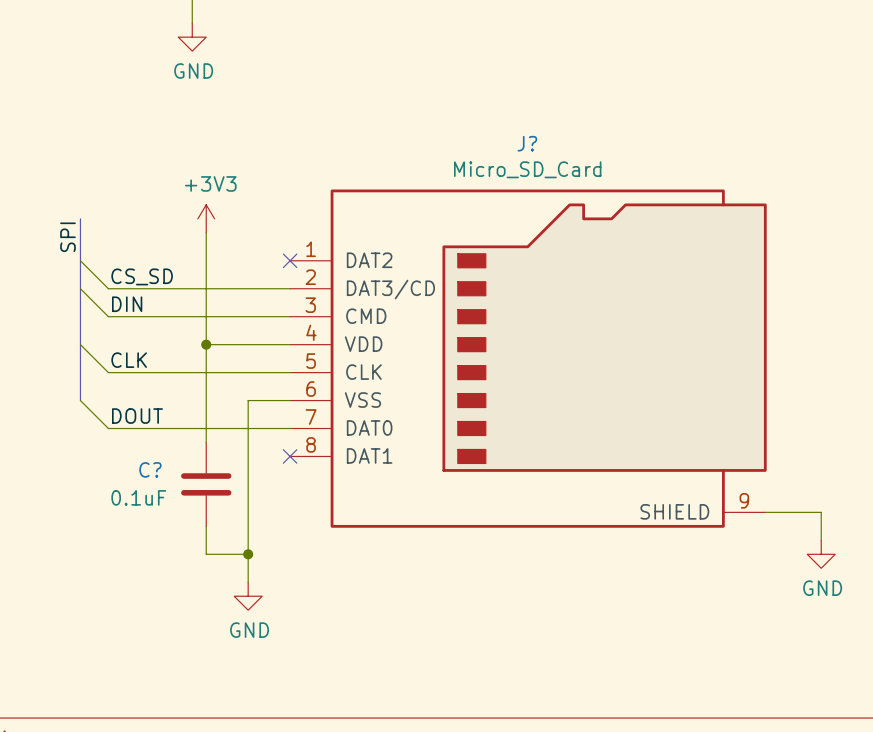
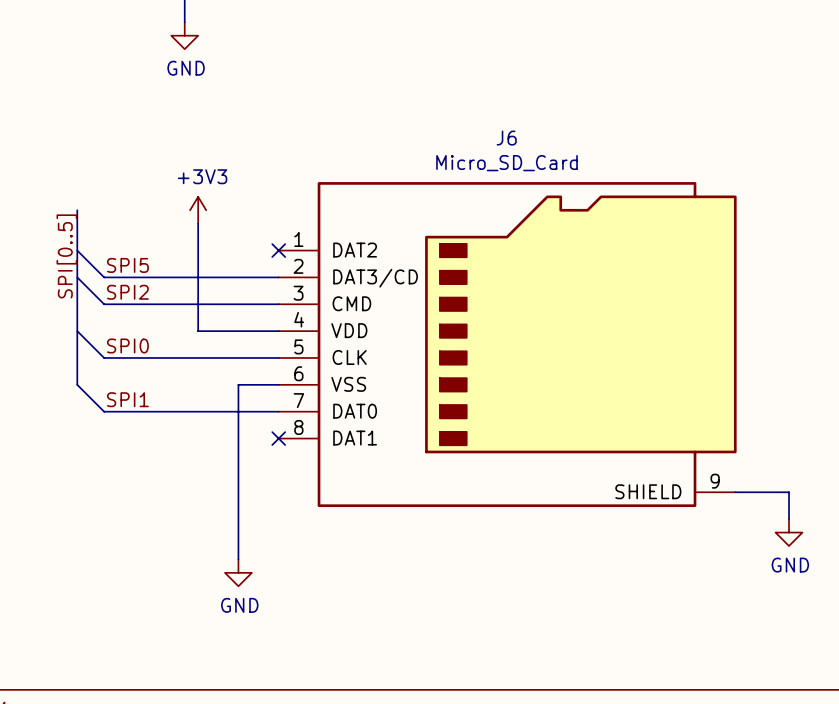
J? name: J? (527, 143) -> J6 (506, 138)
label: SPI (67, 237) -> SPI[0..5] (66, 256)
label: CS_SD (142, 276) -> SPI5 (127, 265)
label: DIN (127, 304) -> SPI2 (127, 292)
wire: (206, 344) (206, 442) -> none
junction: (206, 344) -> none
label: CLK (129, 360) -> SPI0 (127, 346)
label: DOUT (137, 416) -> SPI1 (127, 399)
C?: 0.1uF (206, 484) -> none
wire: (206, 526) (206, 554) (248, 554) -> none
junction: (248, 554) -> none

